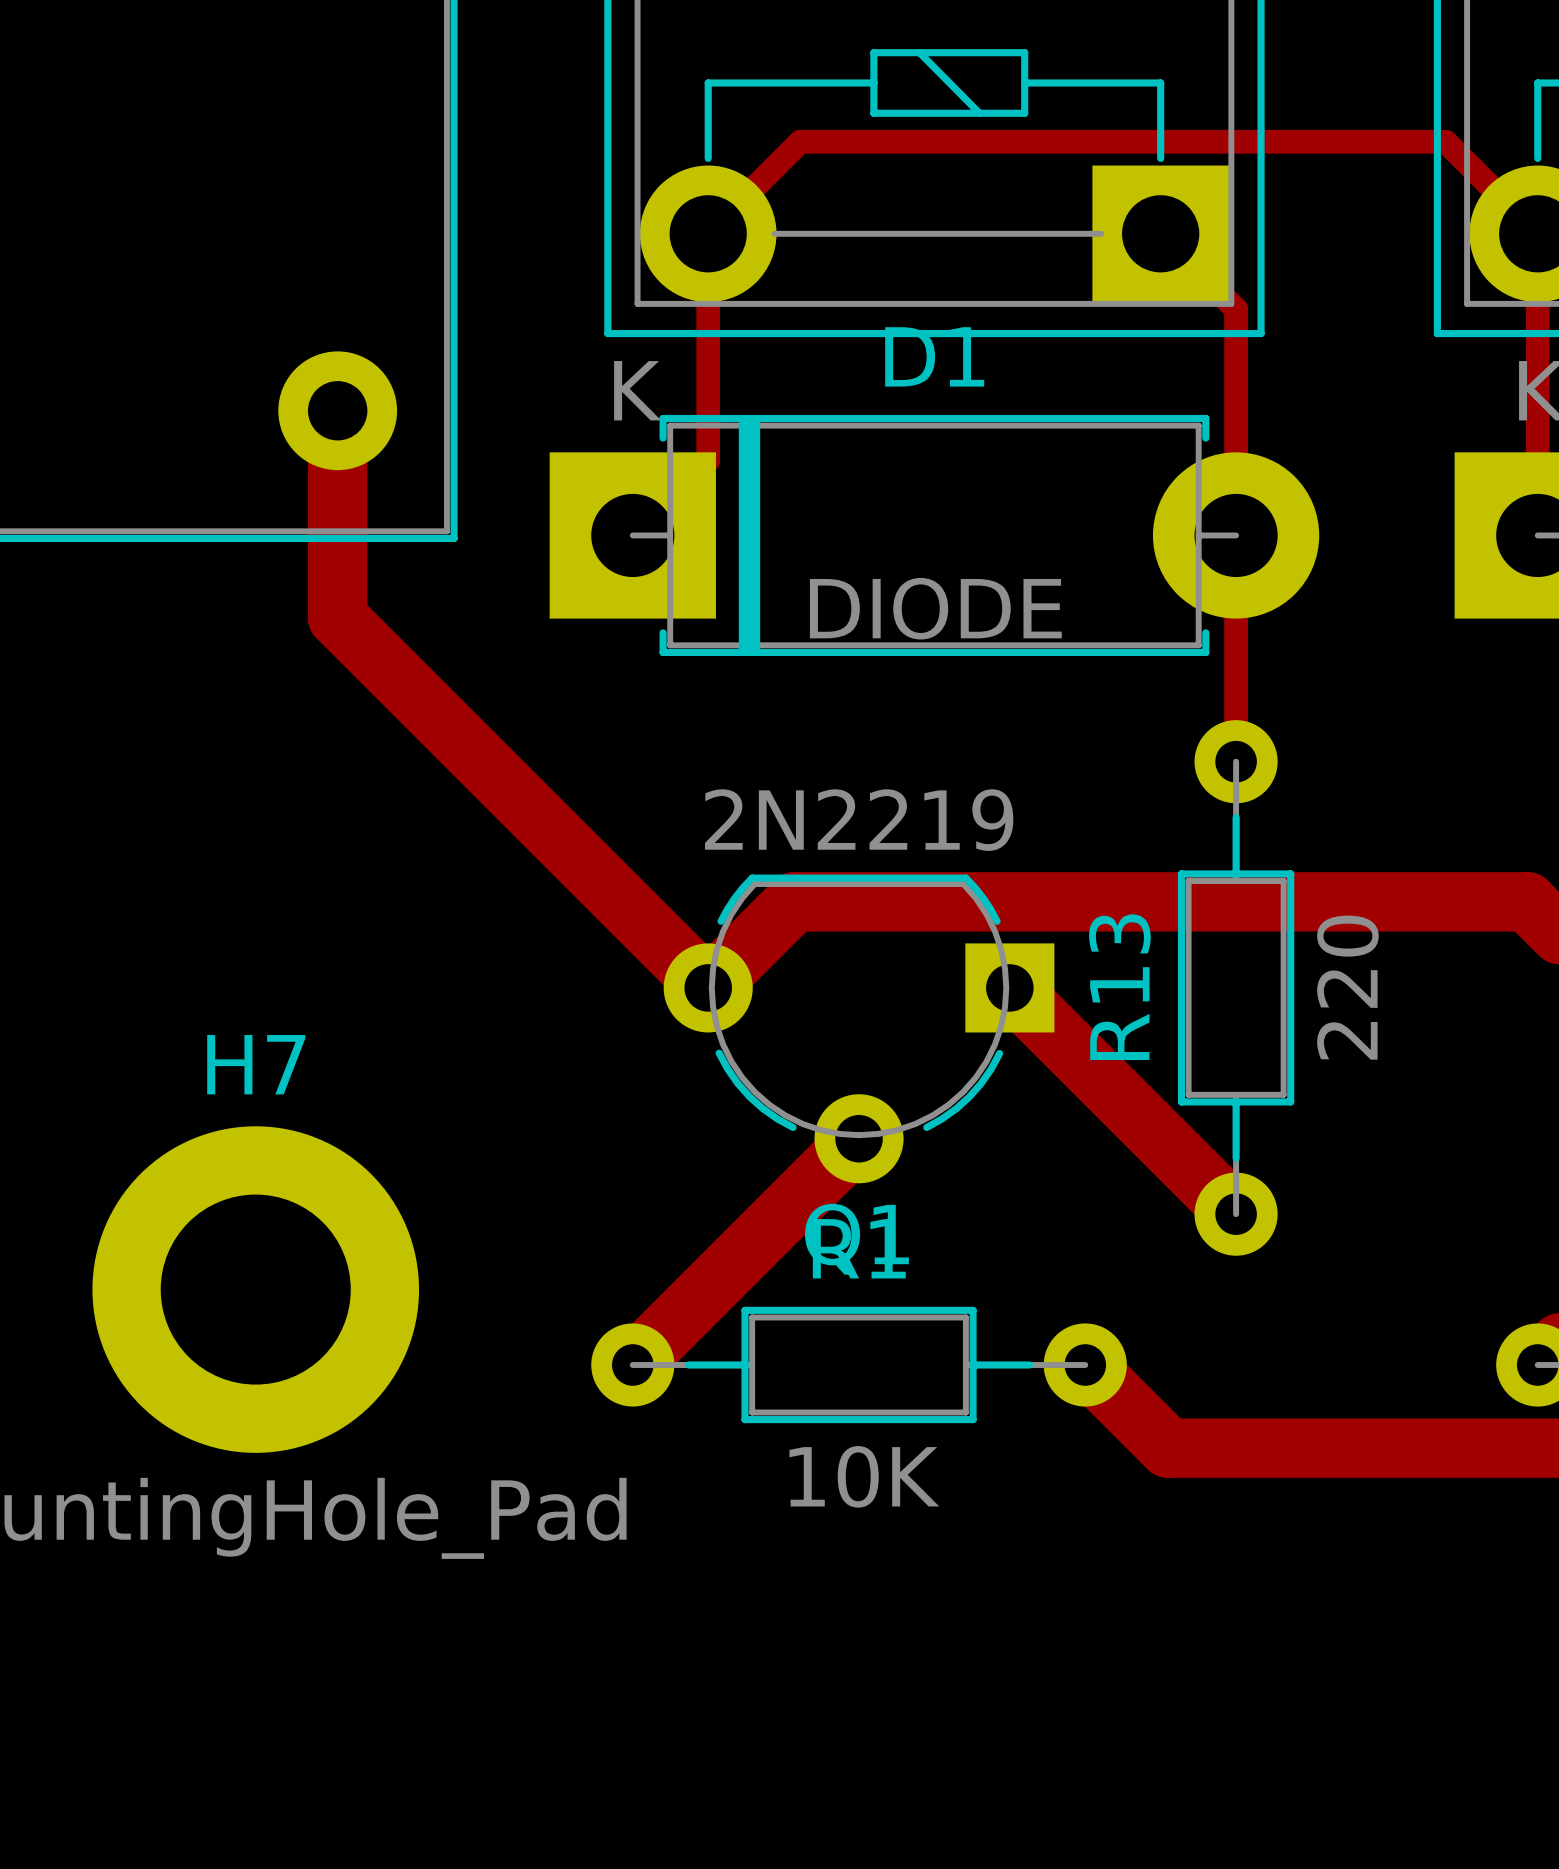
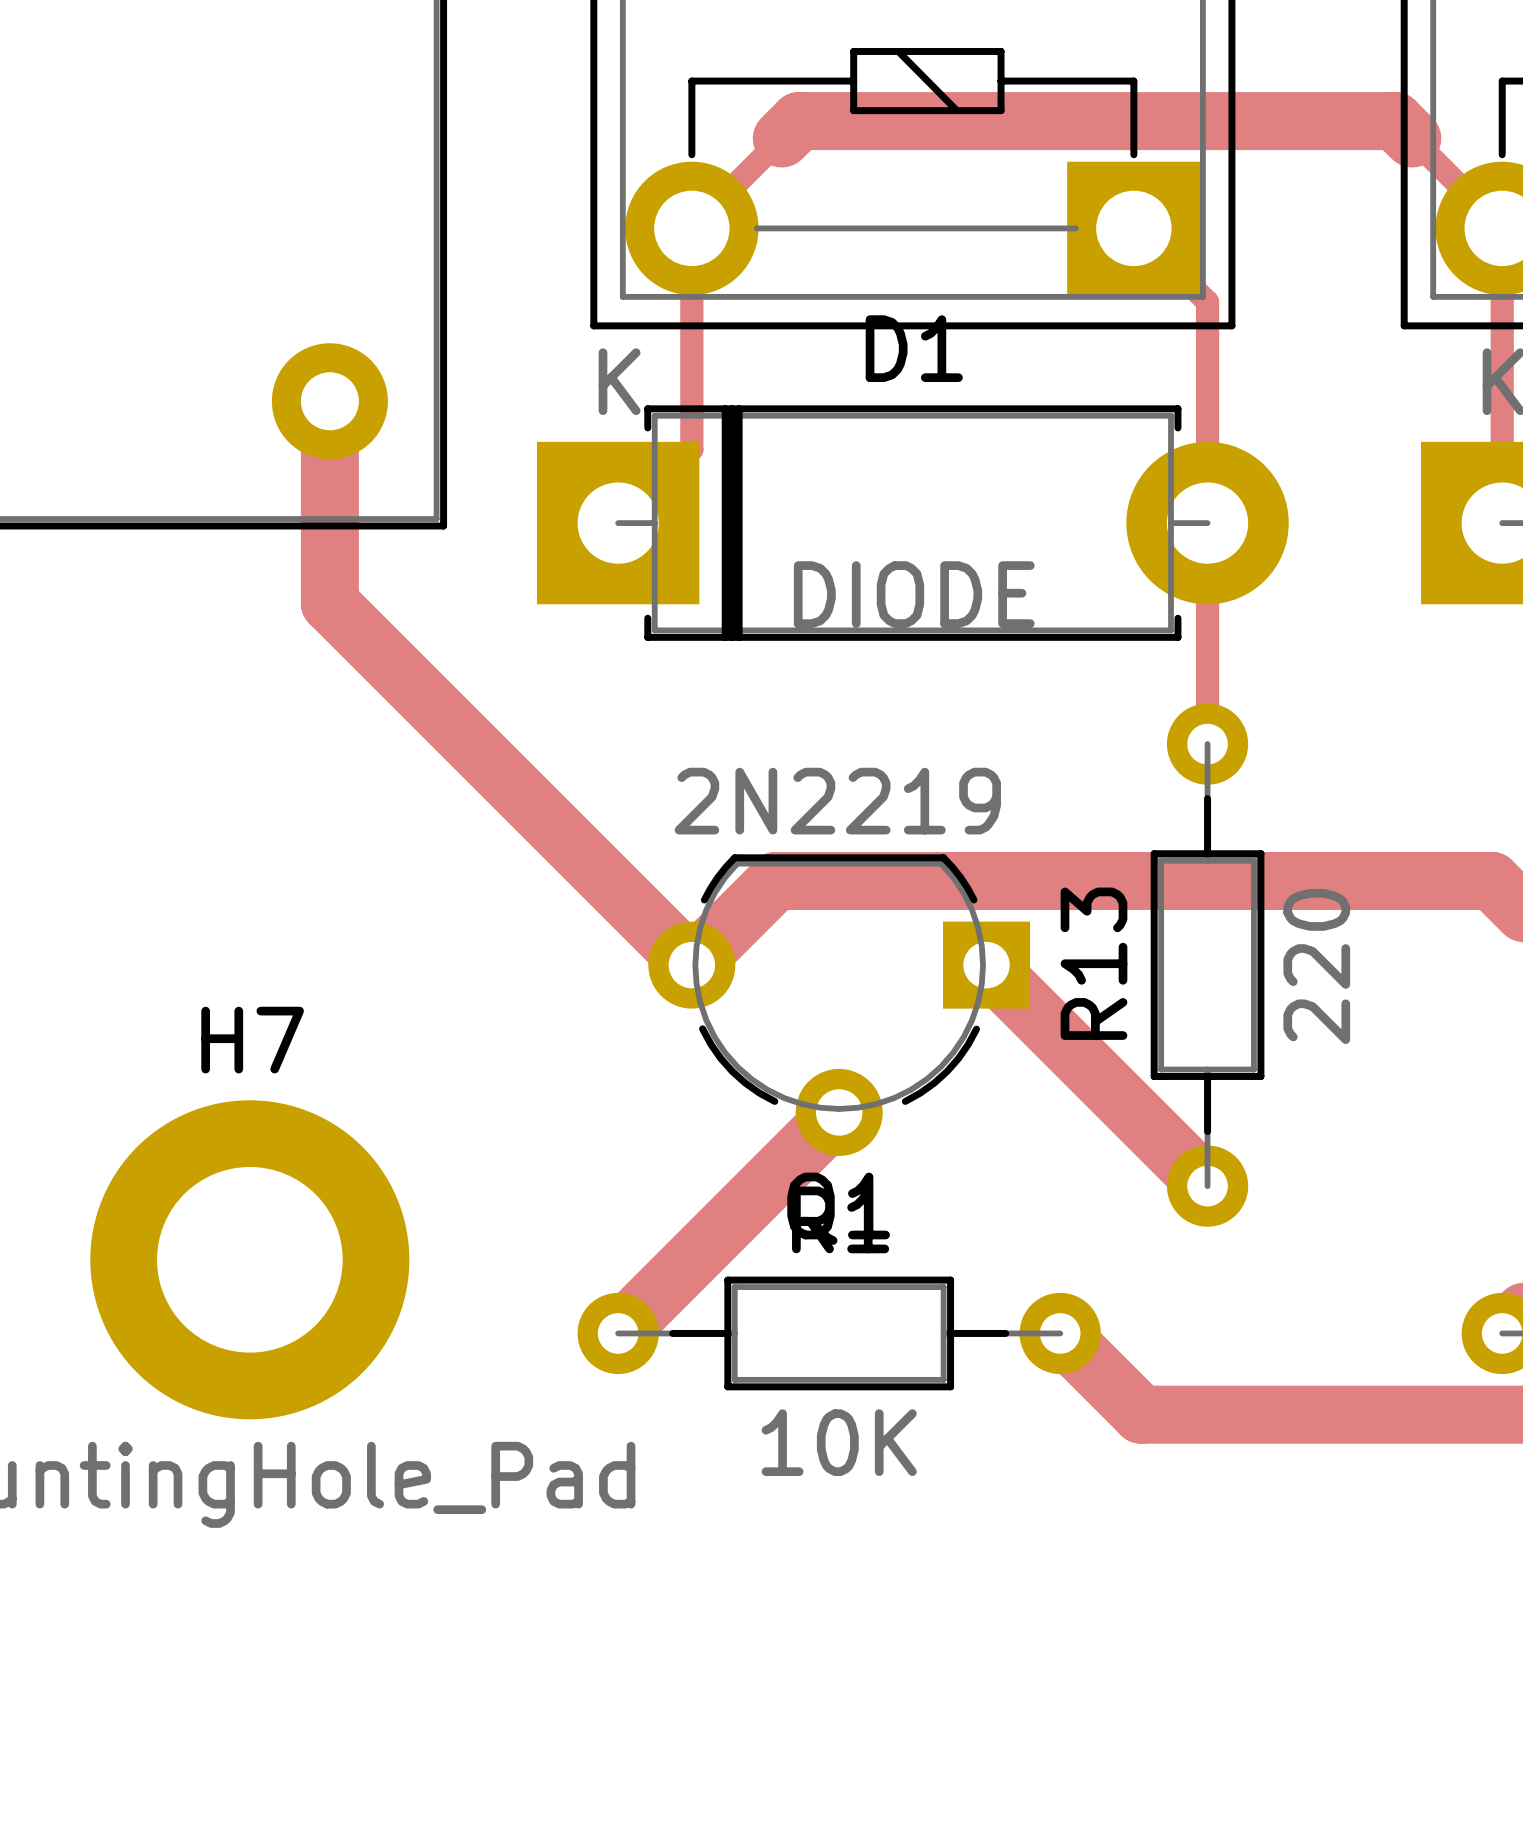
track: (800, 141) (1445, 141) -> (781, 138) (799, 121) (1394, 121) (1412, 138)

